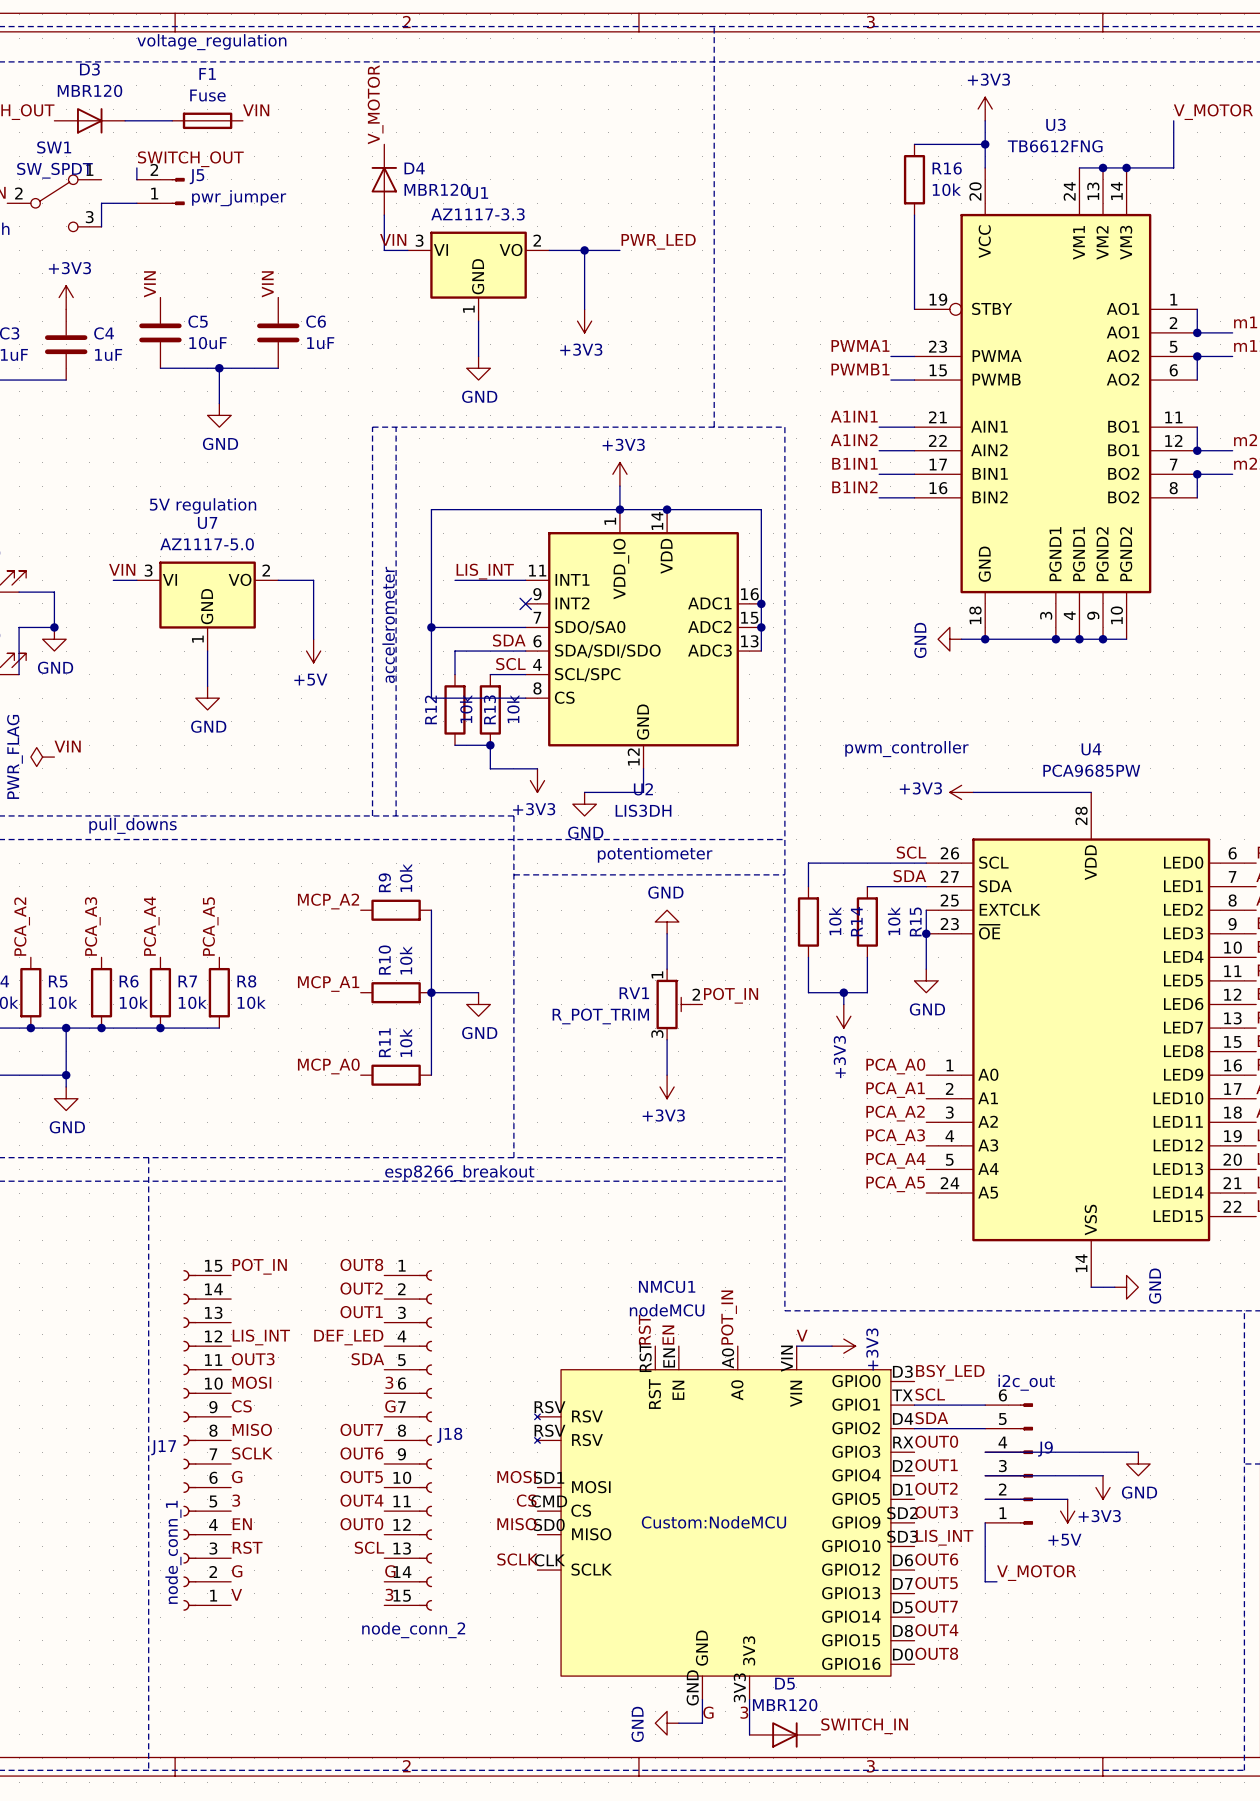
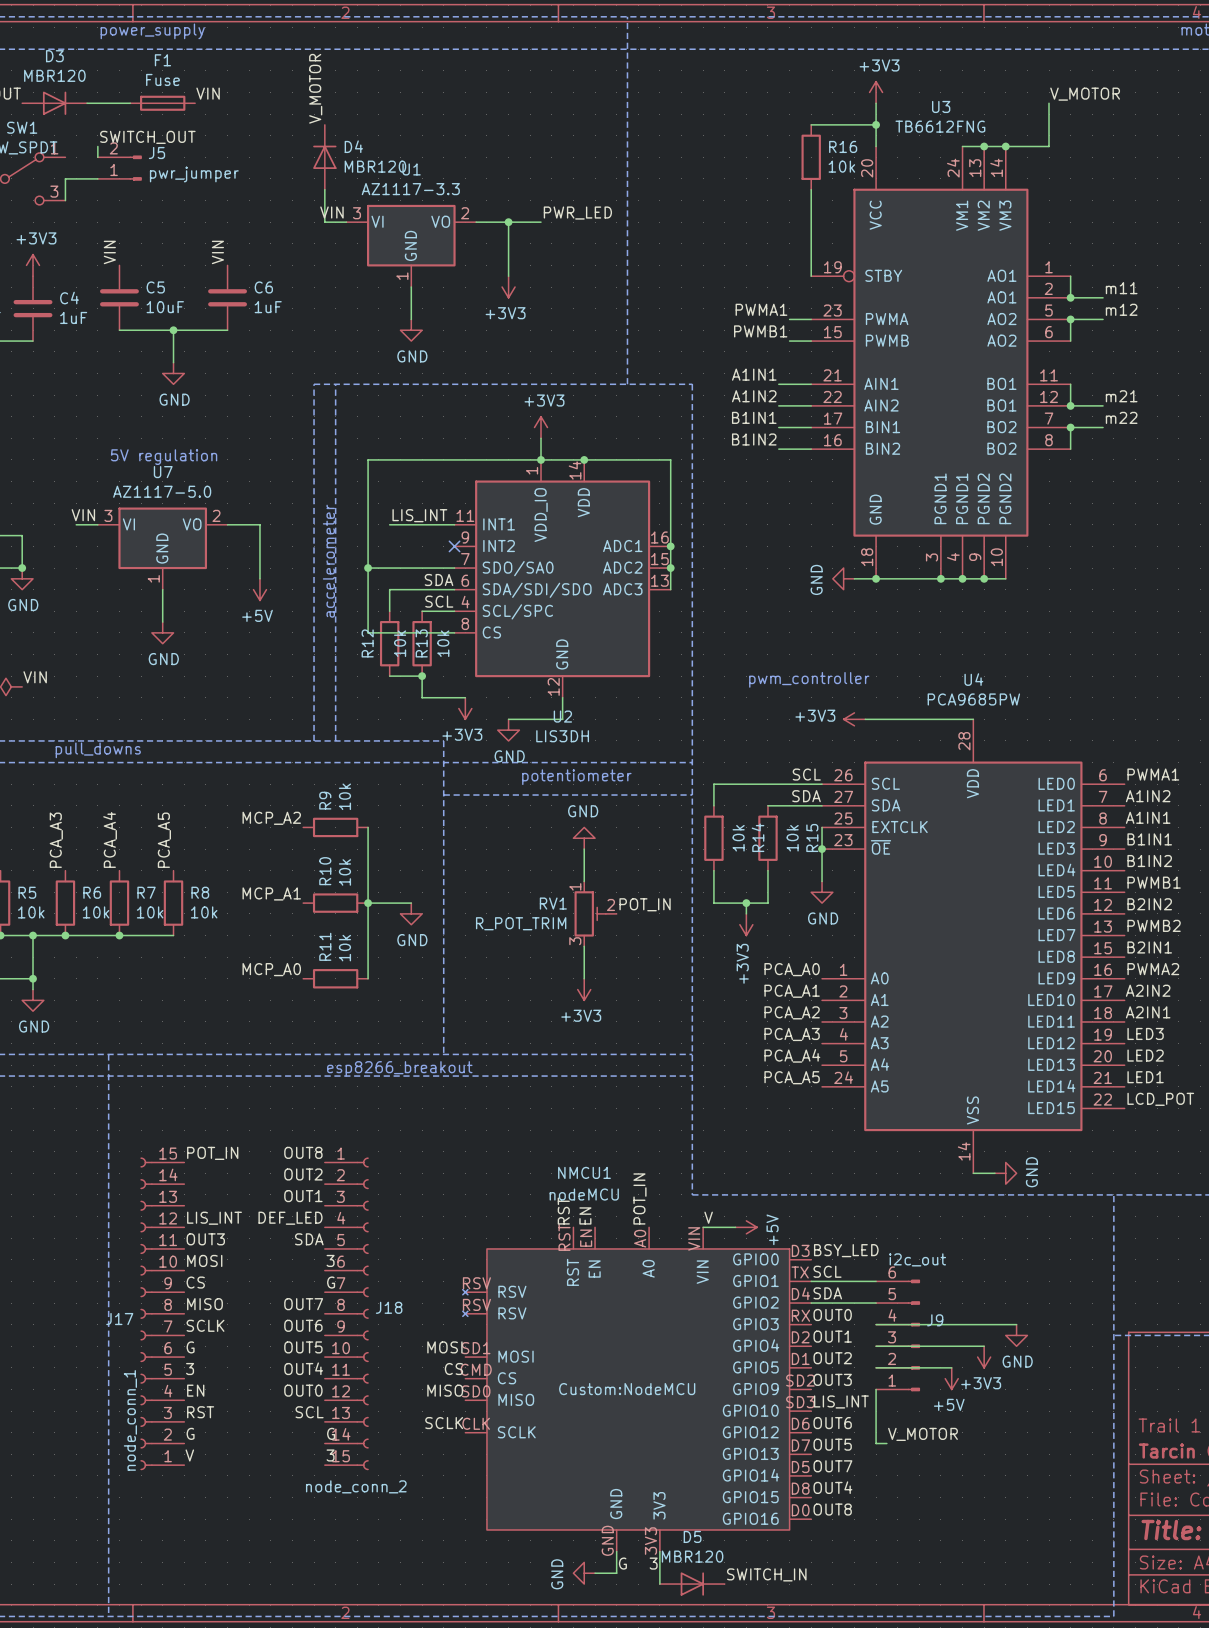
text: voltage_regulation (211, 42) -> power_supply (152, 31)
power symbol: +3V3 (843, 1346) -> +5V (746, 1227)

